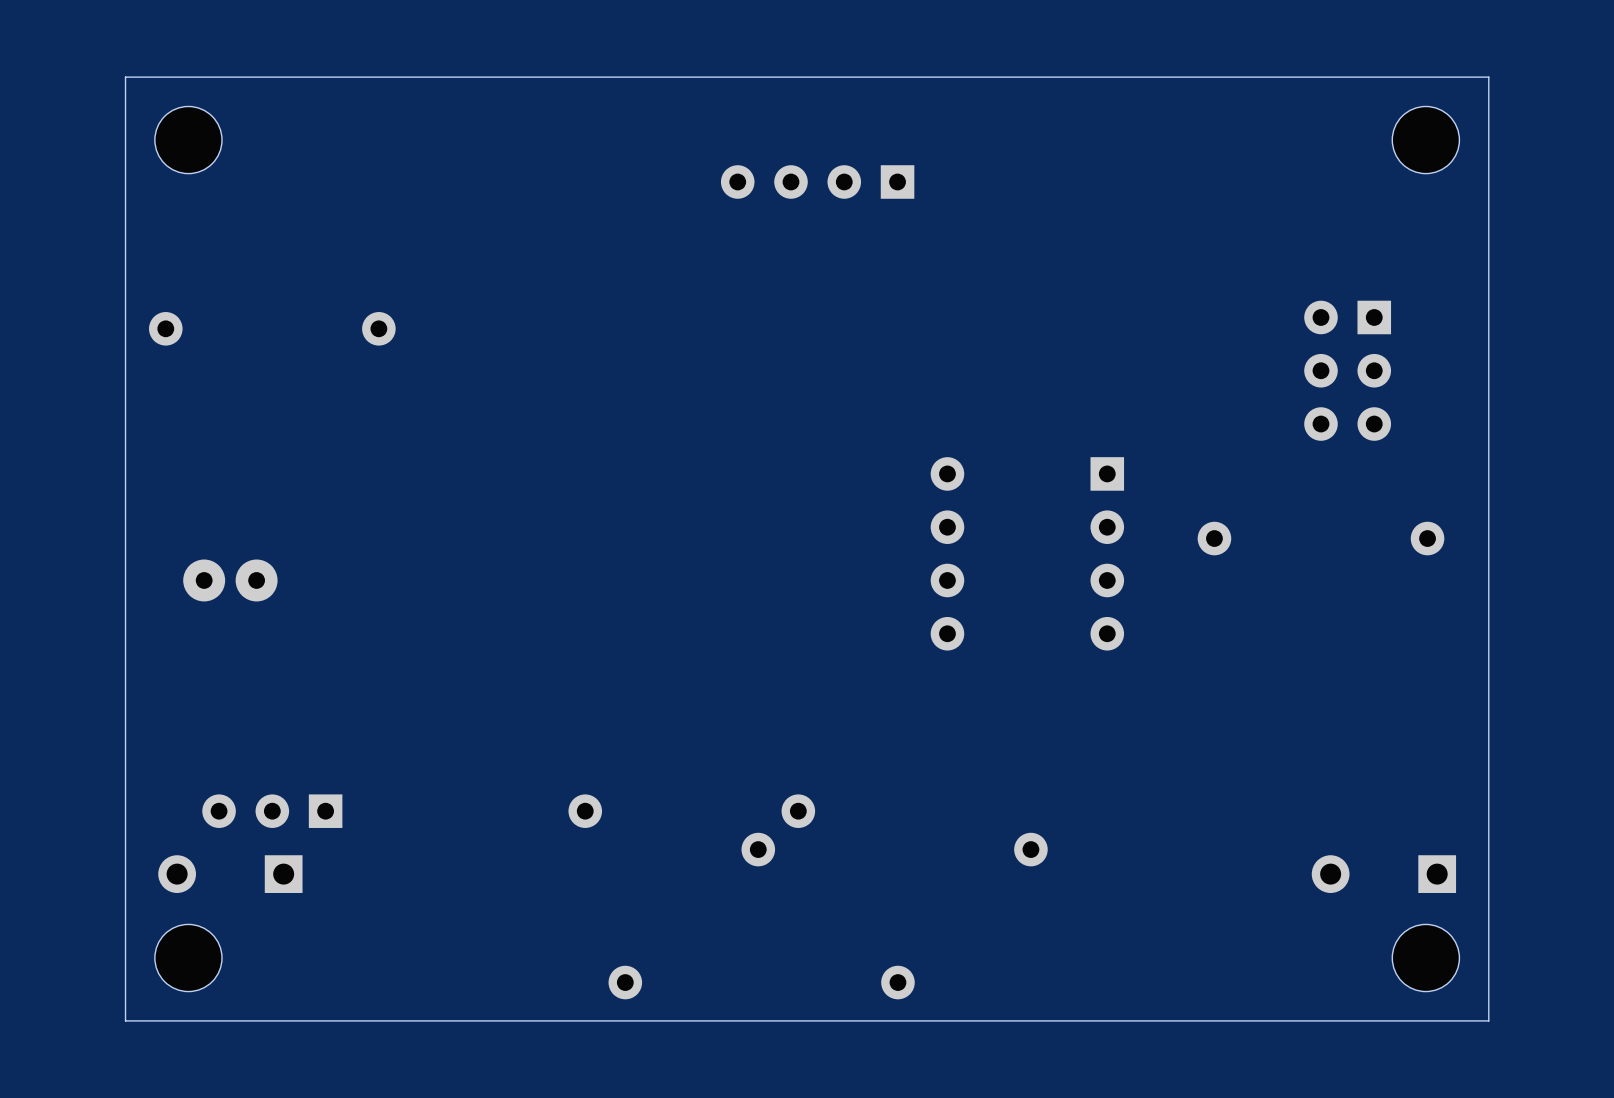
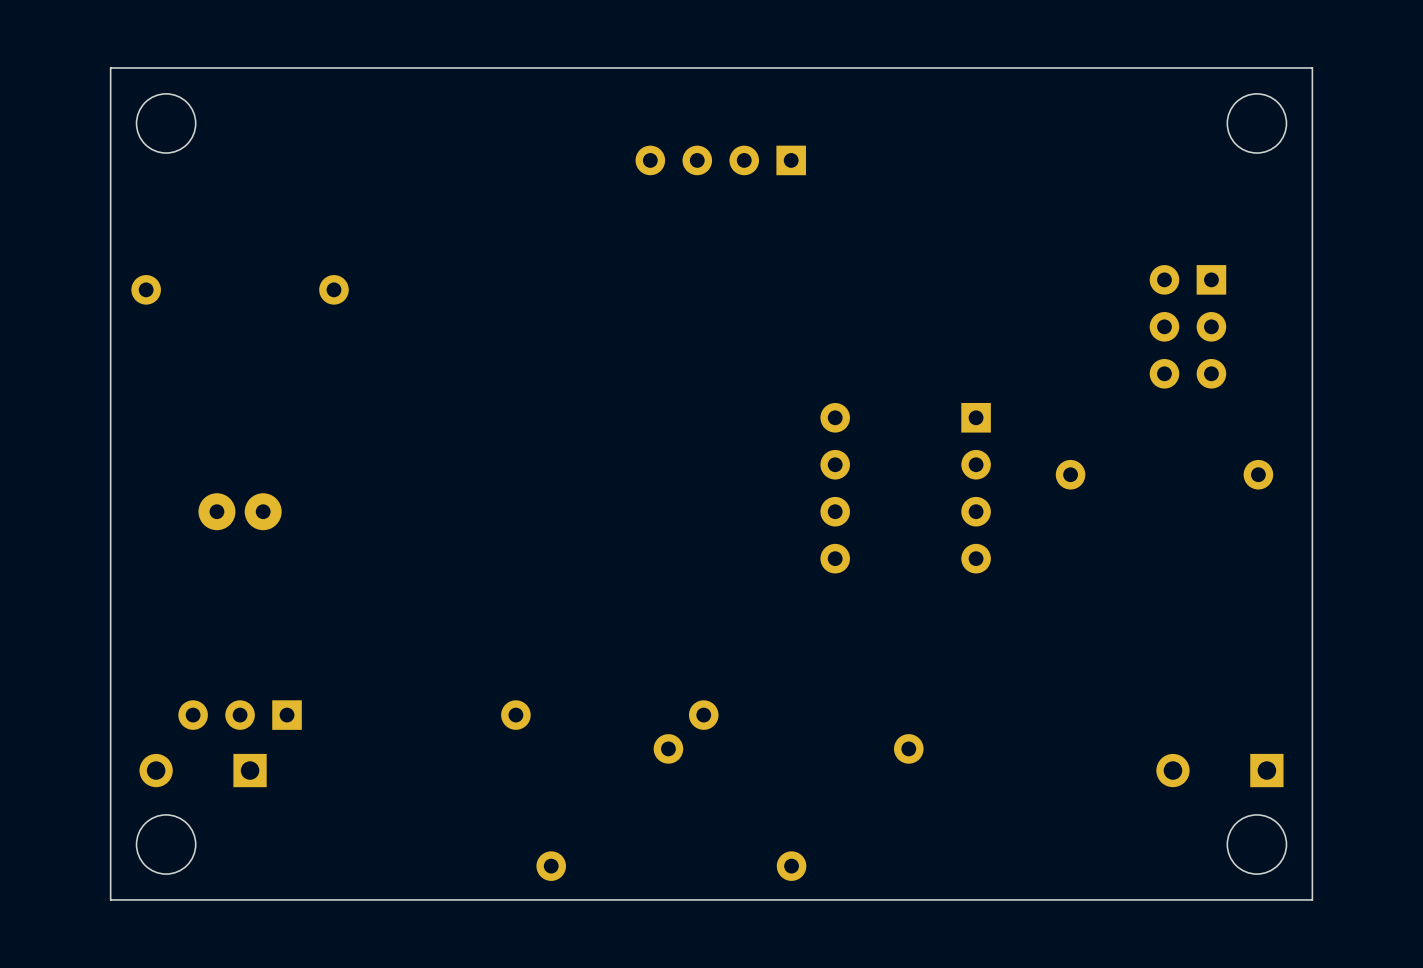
part position: (230, 580) -> (240, 511)

